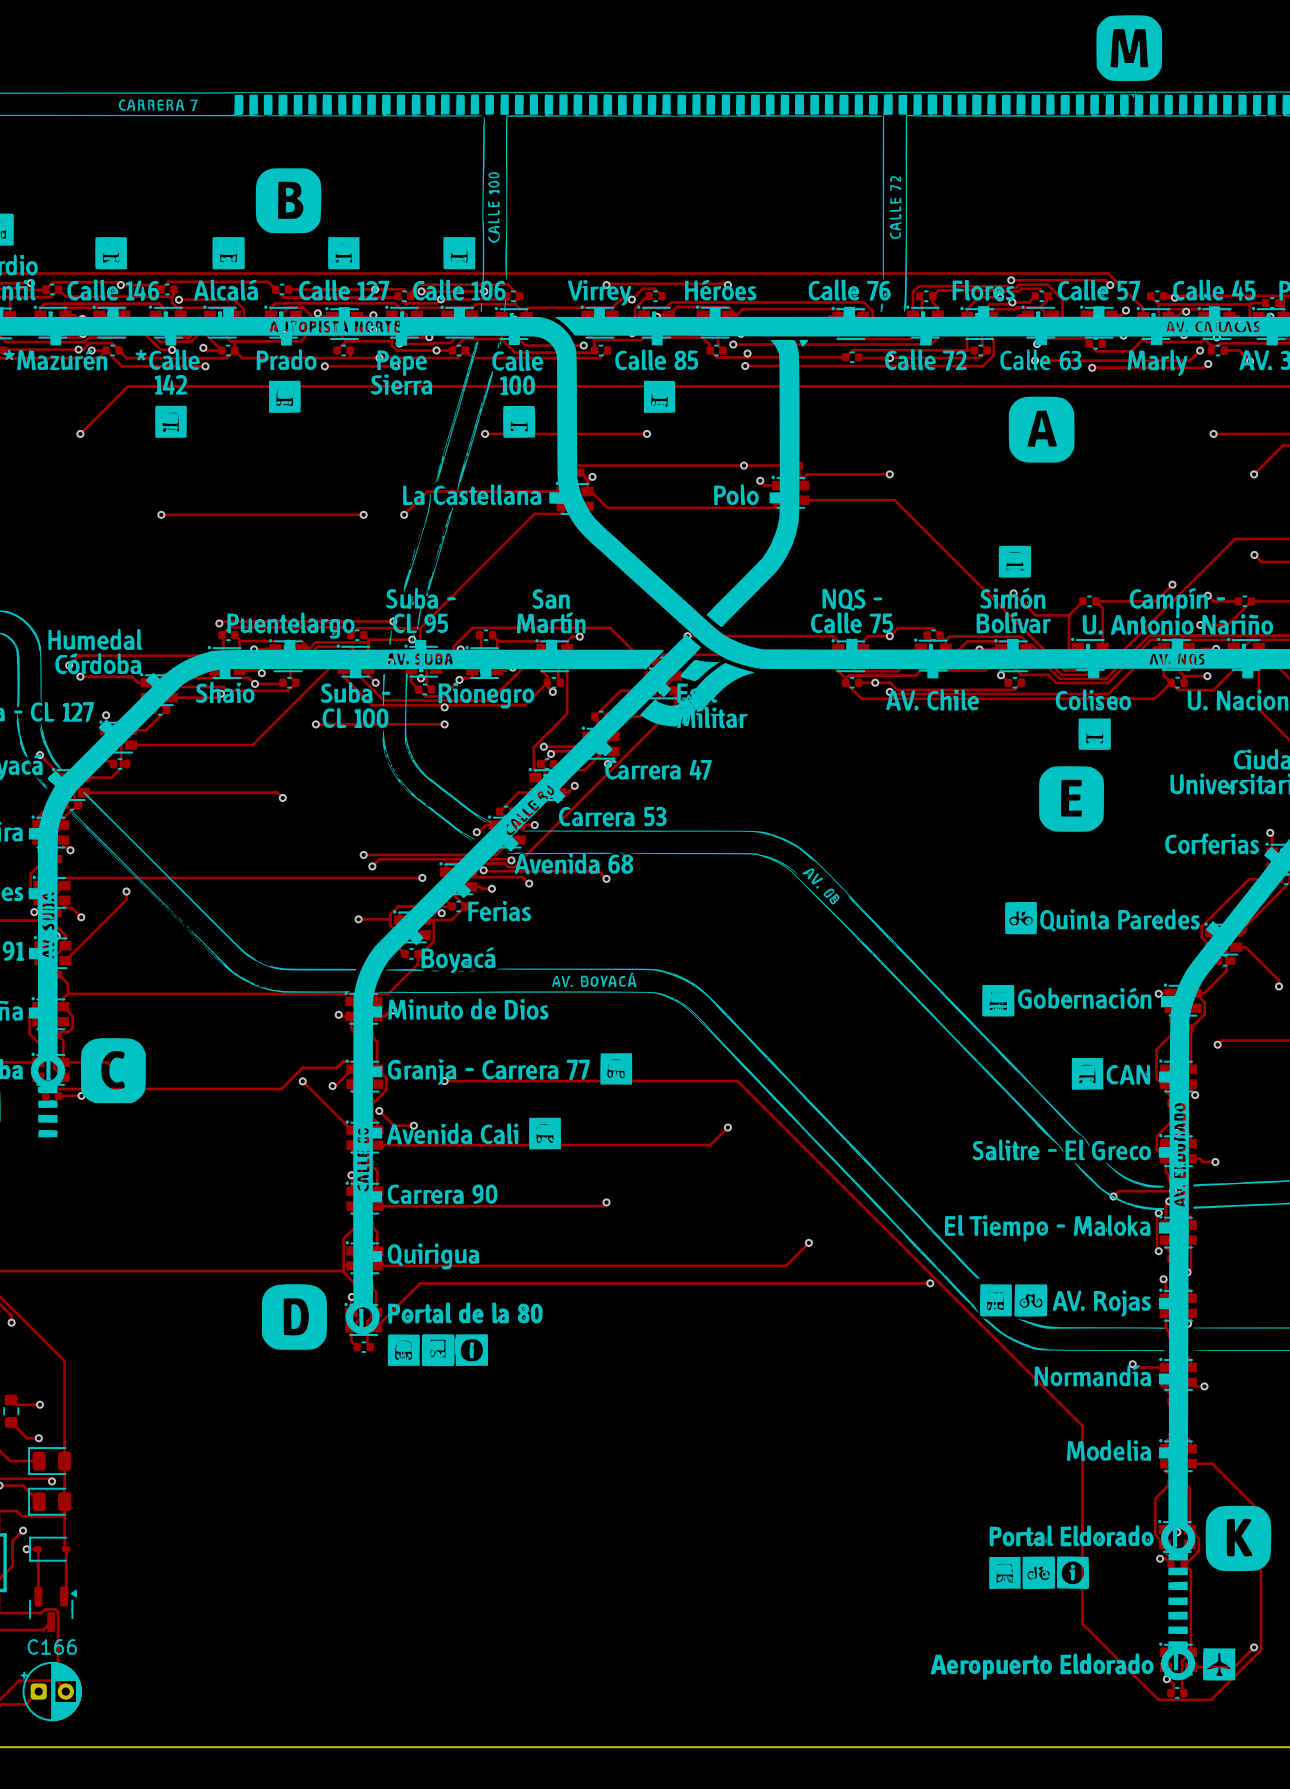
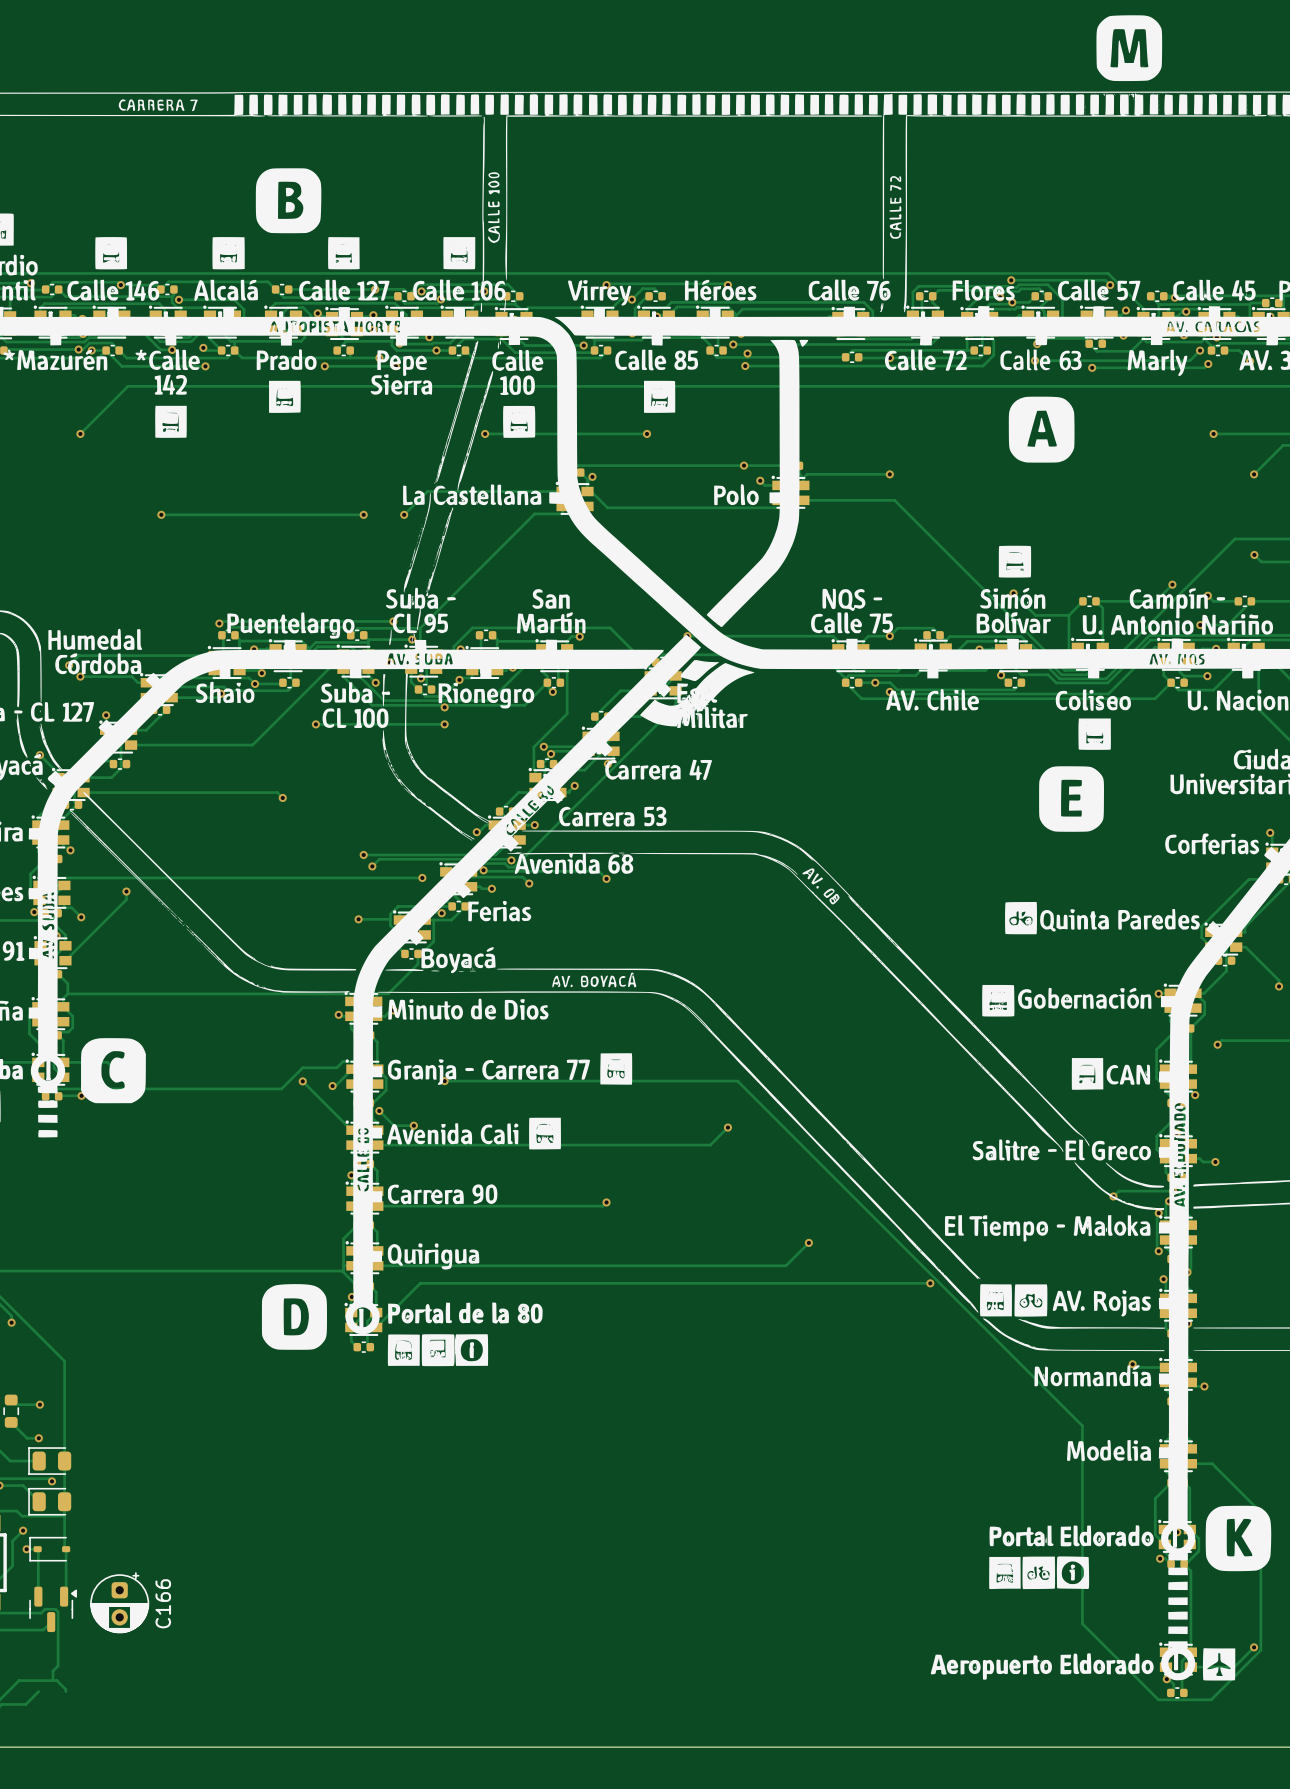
C166 rotation: 0° (51, 1691) -> 90° clockwise (119, 1602)
C166 position: (51, 1691) -> (119, 1602)

